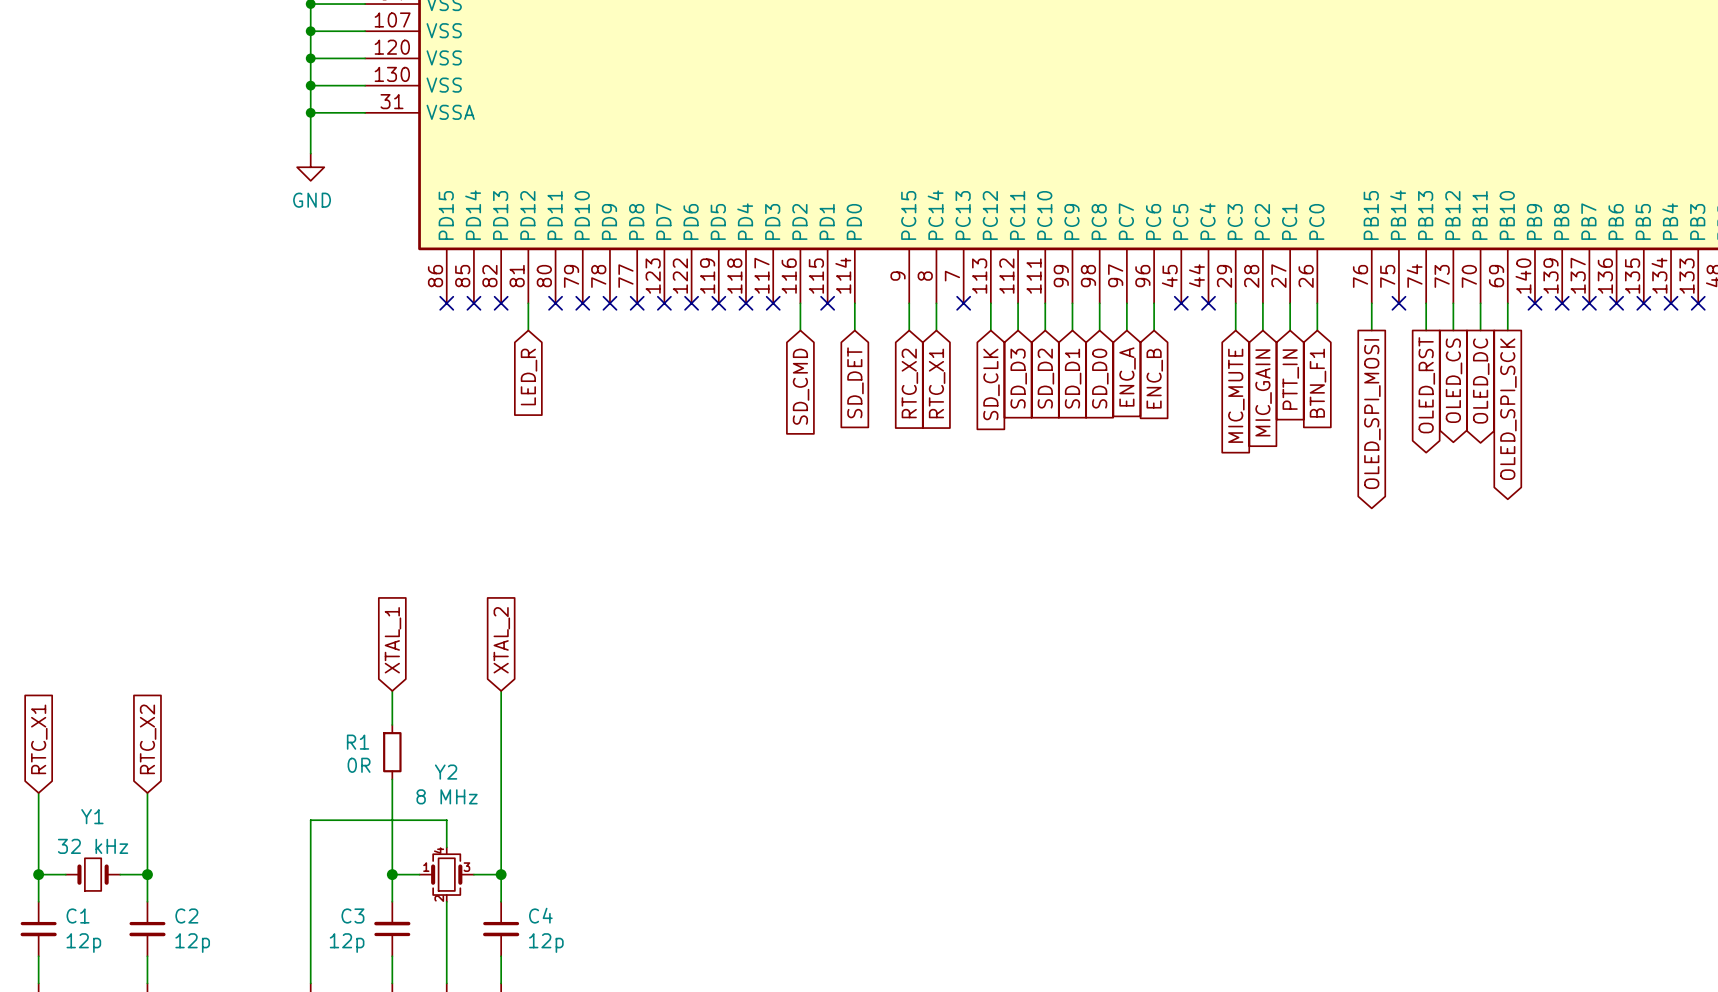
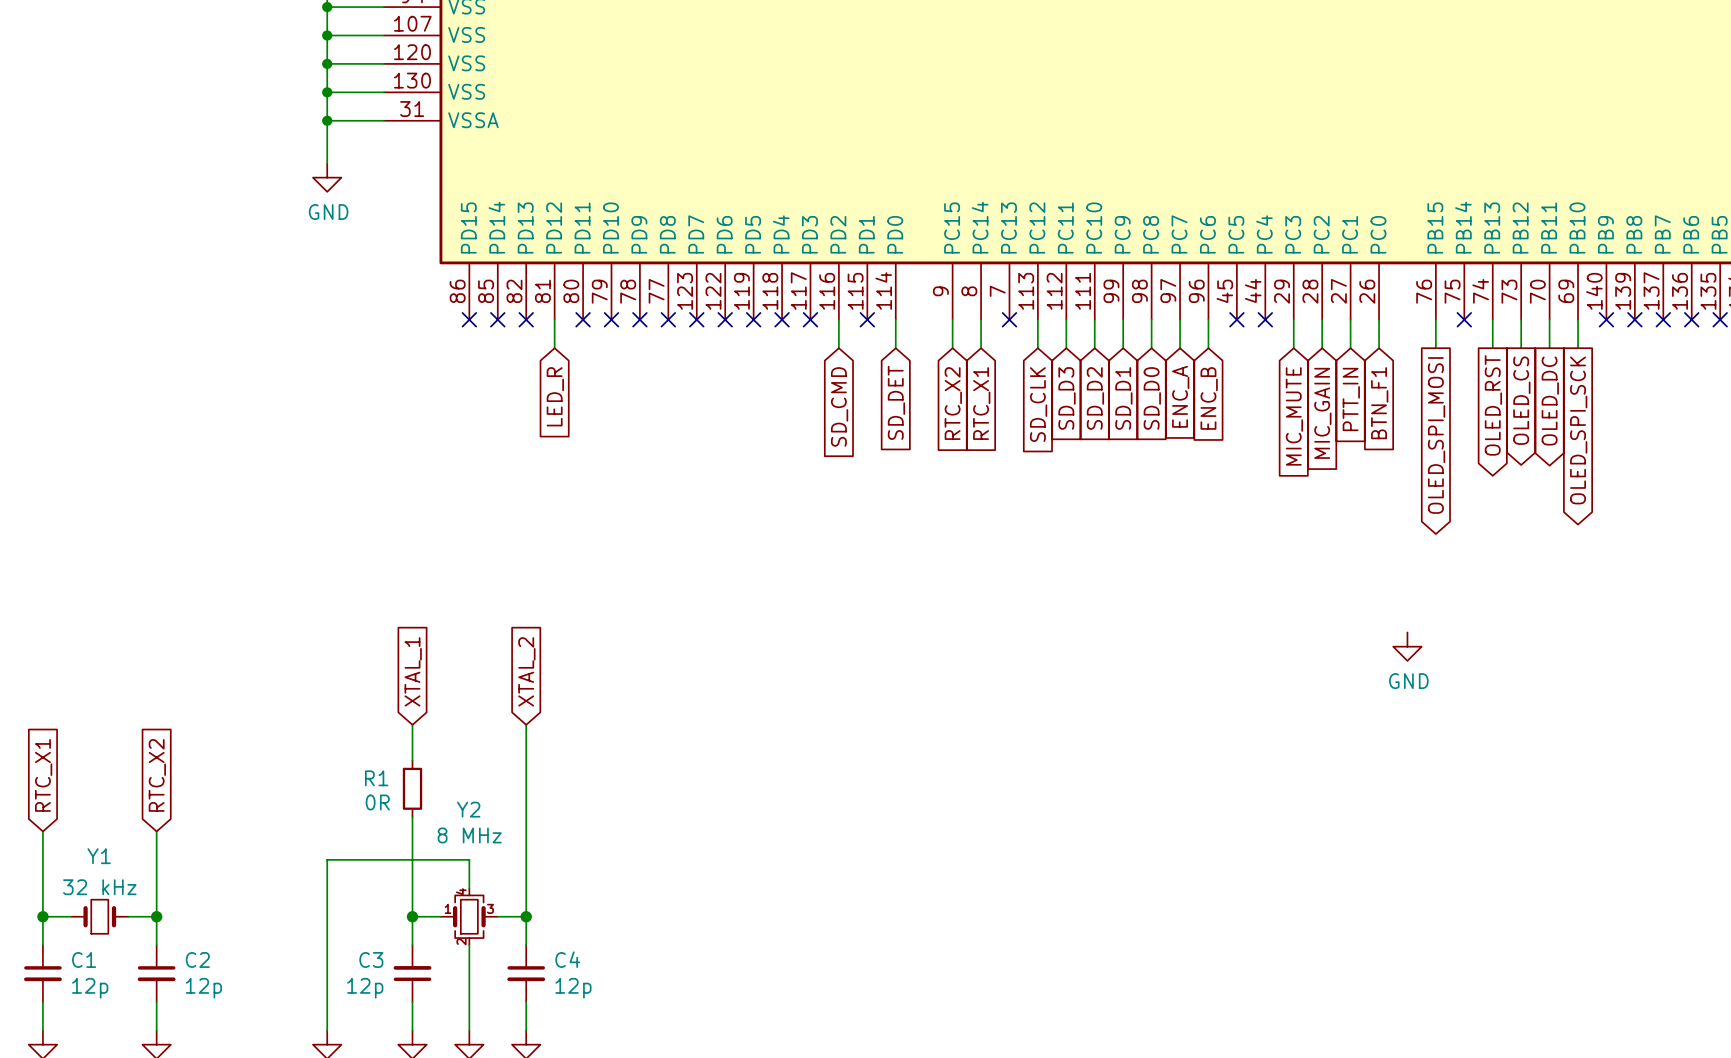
power symbol: none -> GND (1407, 646)

